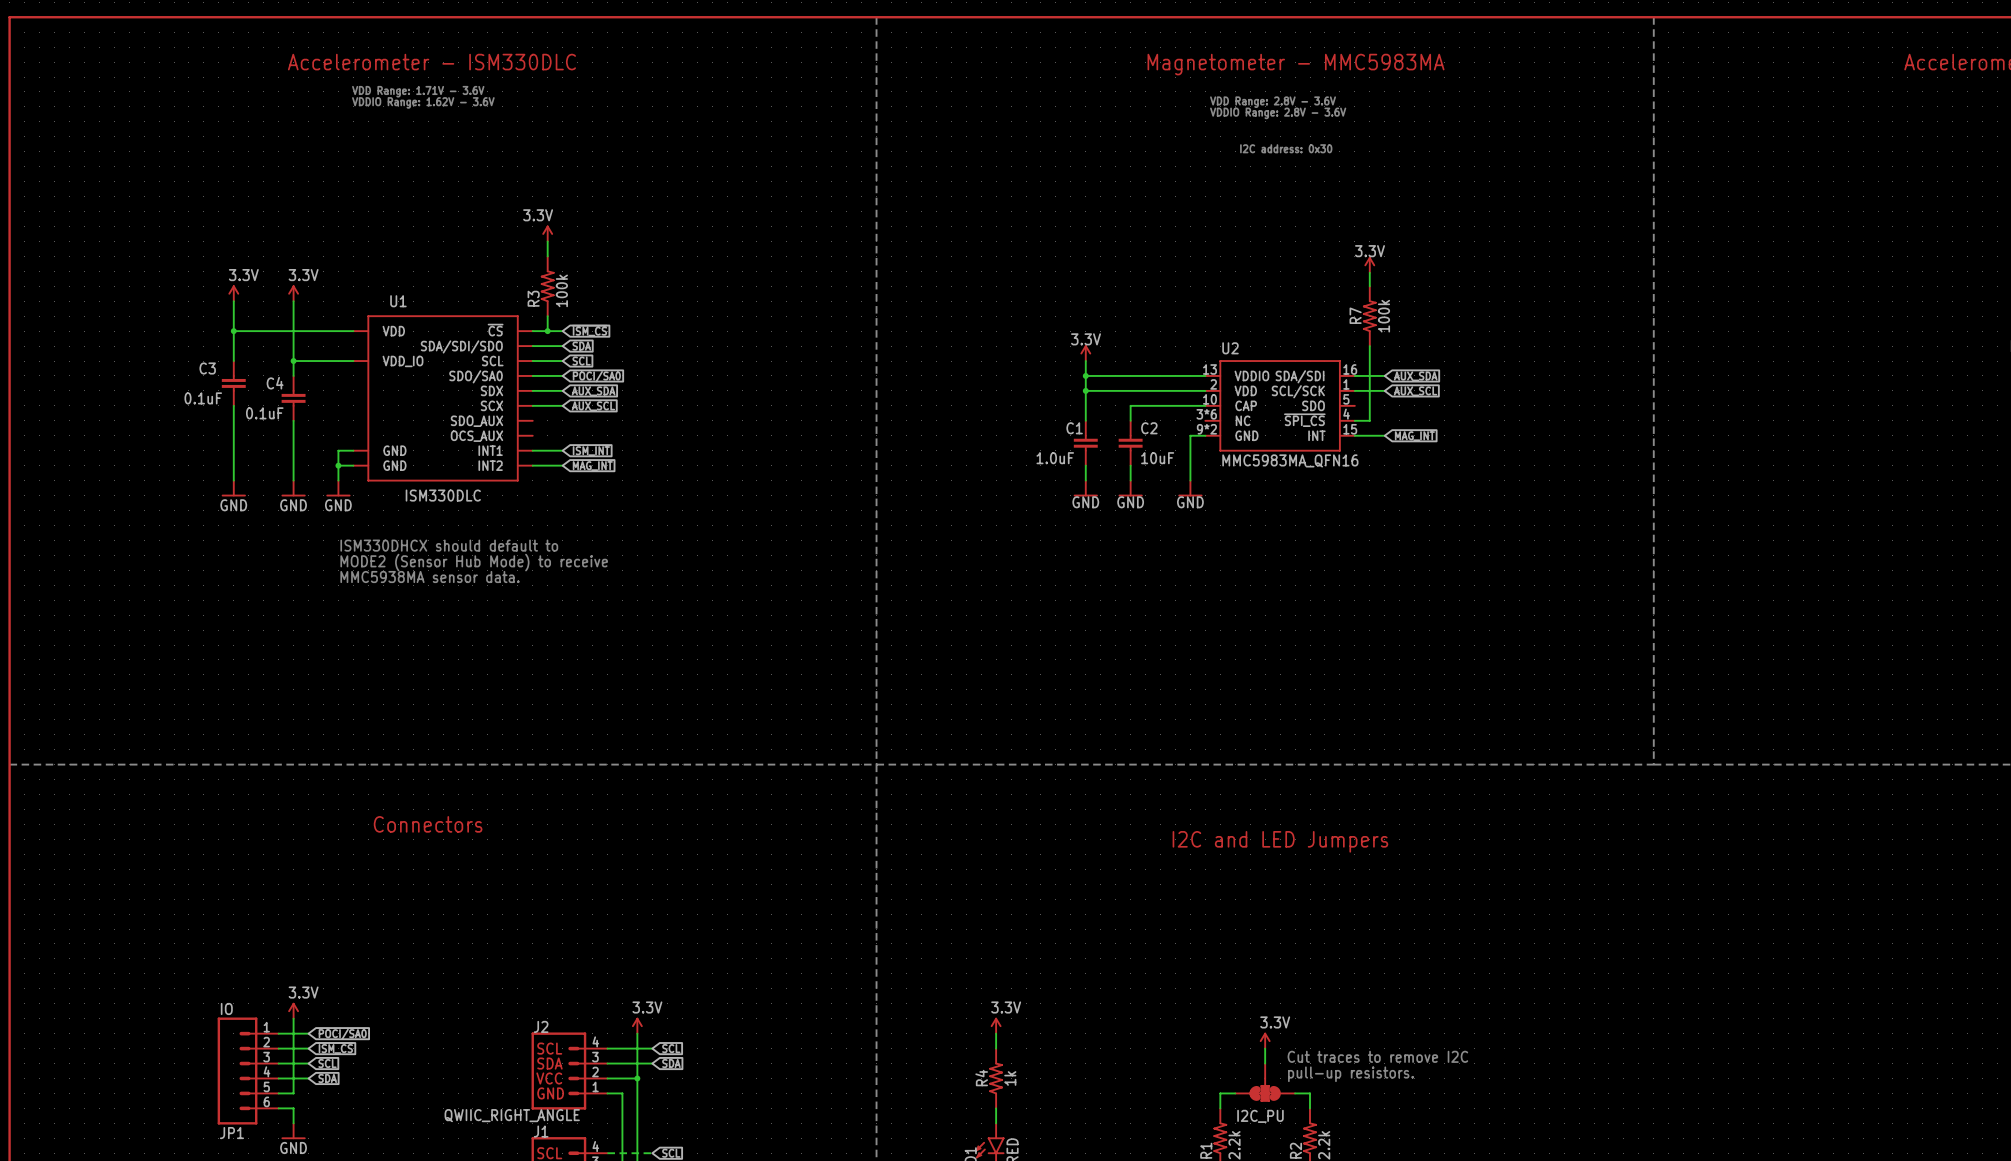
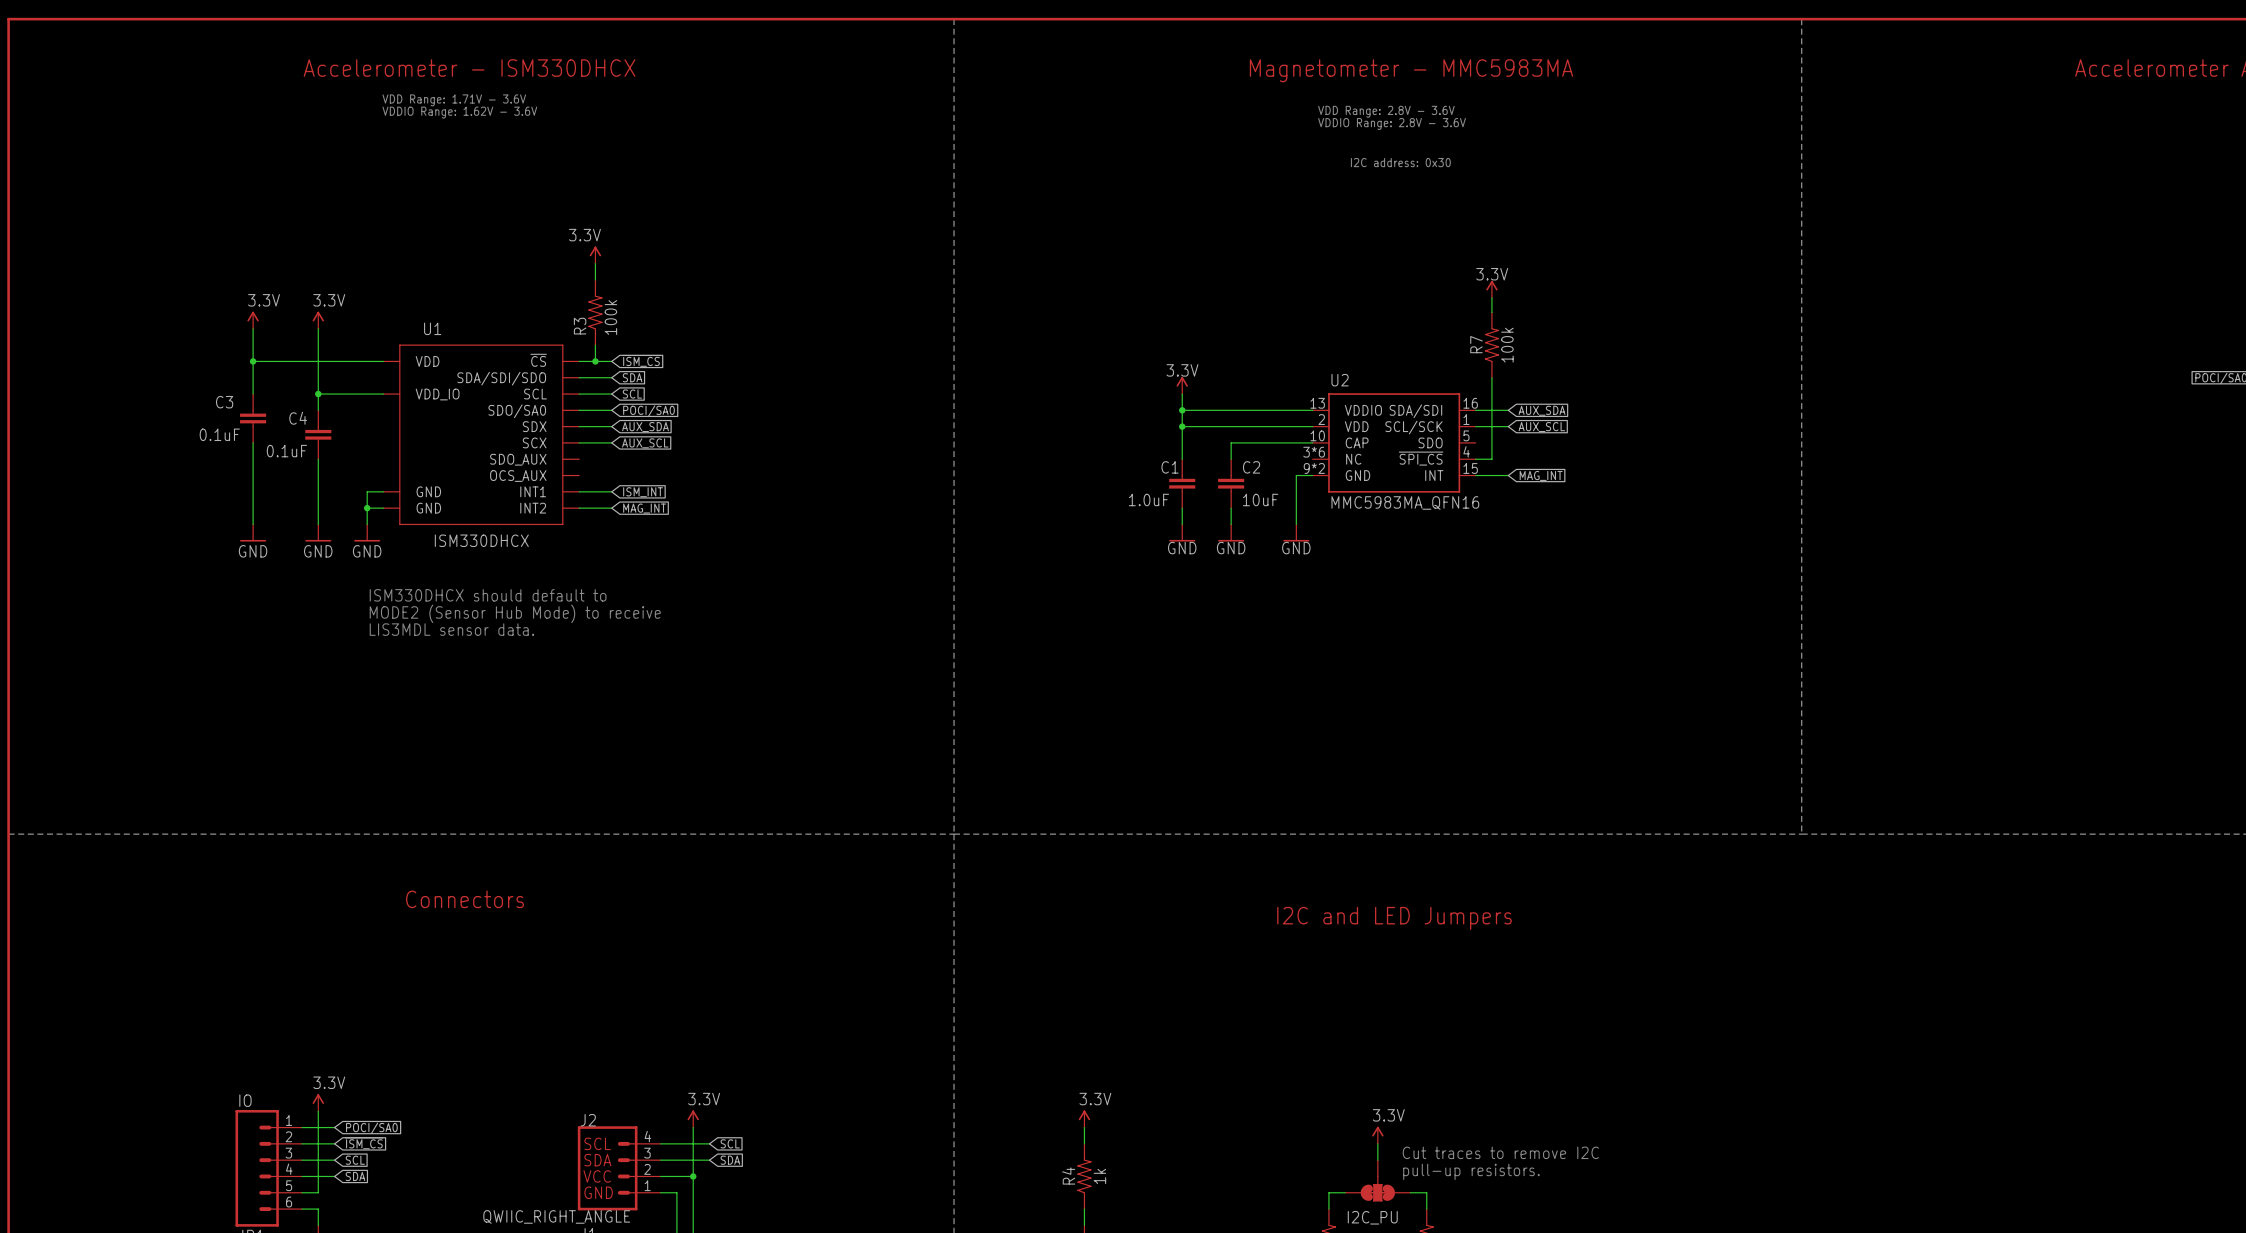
text: Accelerometer - ISM330DLC (431, 62) -> Accelerometer - ISM330DHCX (469, 68)
U1 value: ISM330DLC (443, 495) -> ISM330DHCX (481, 540)
text: MMC5938MA sensor data. (430, 577) -> LIS3MDL sensor data. (451, 629)

